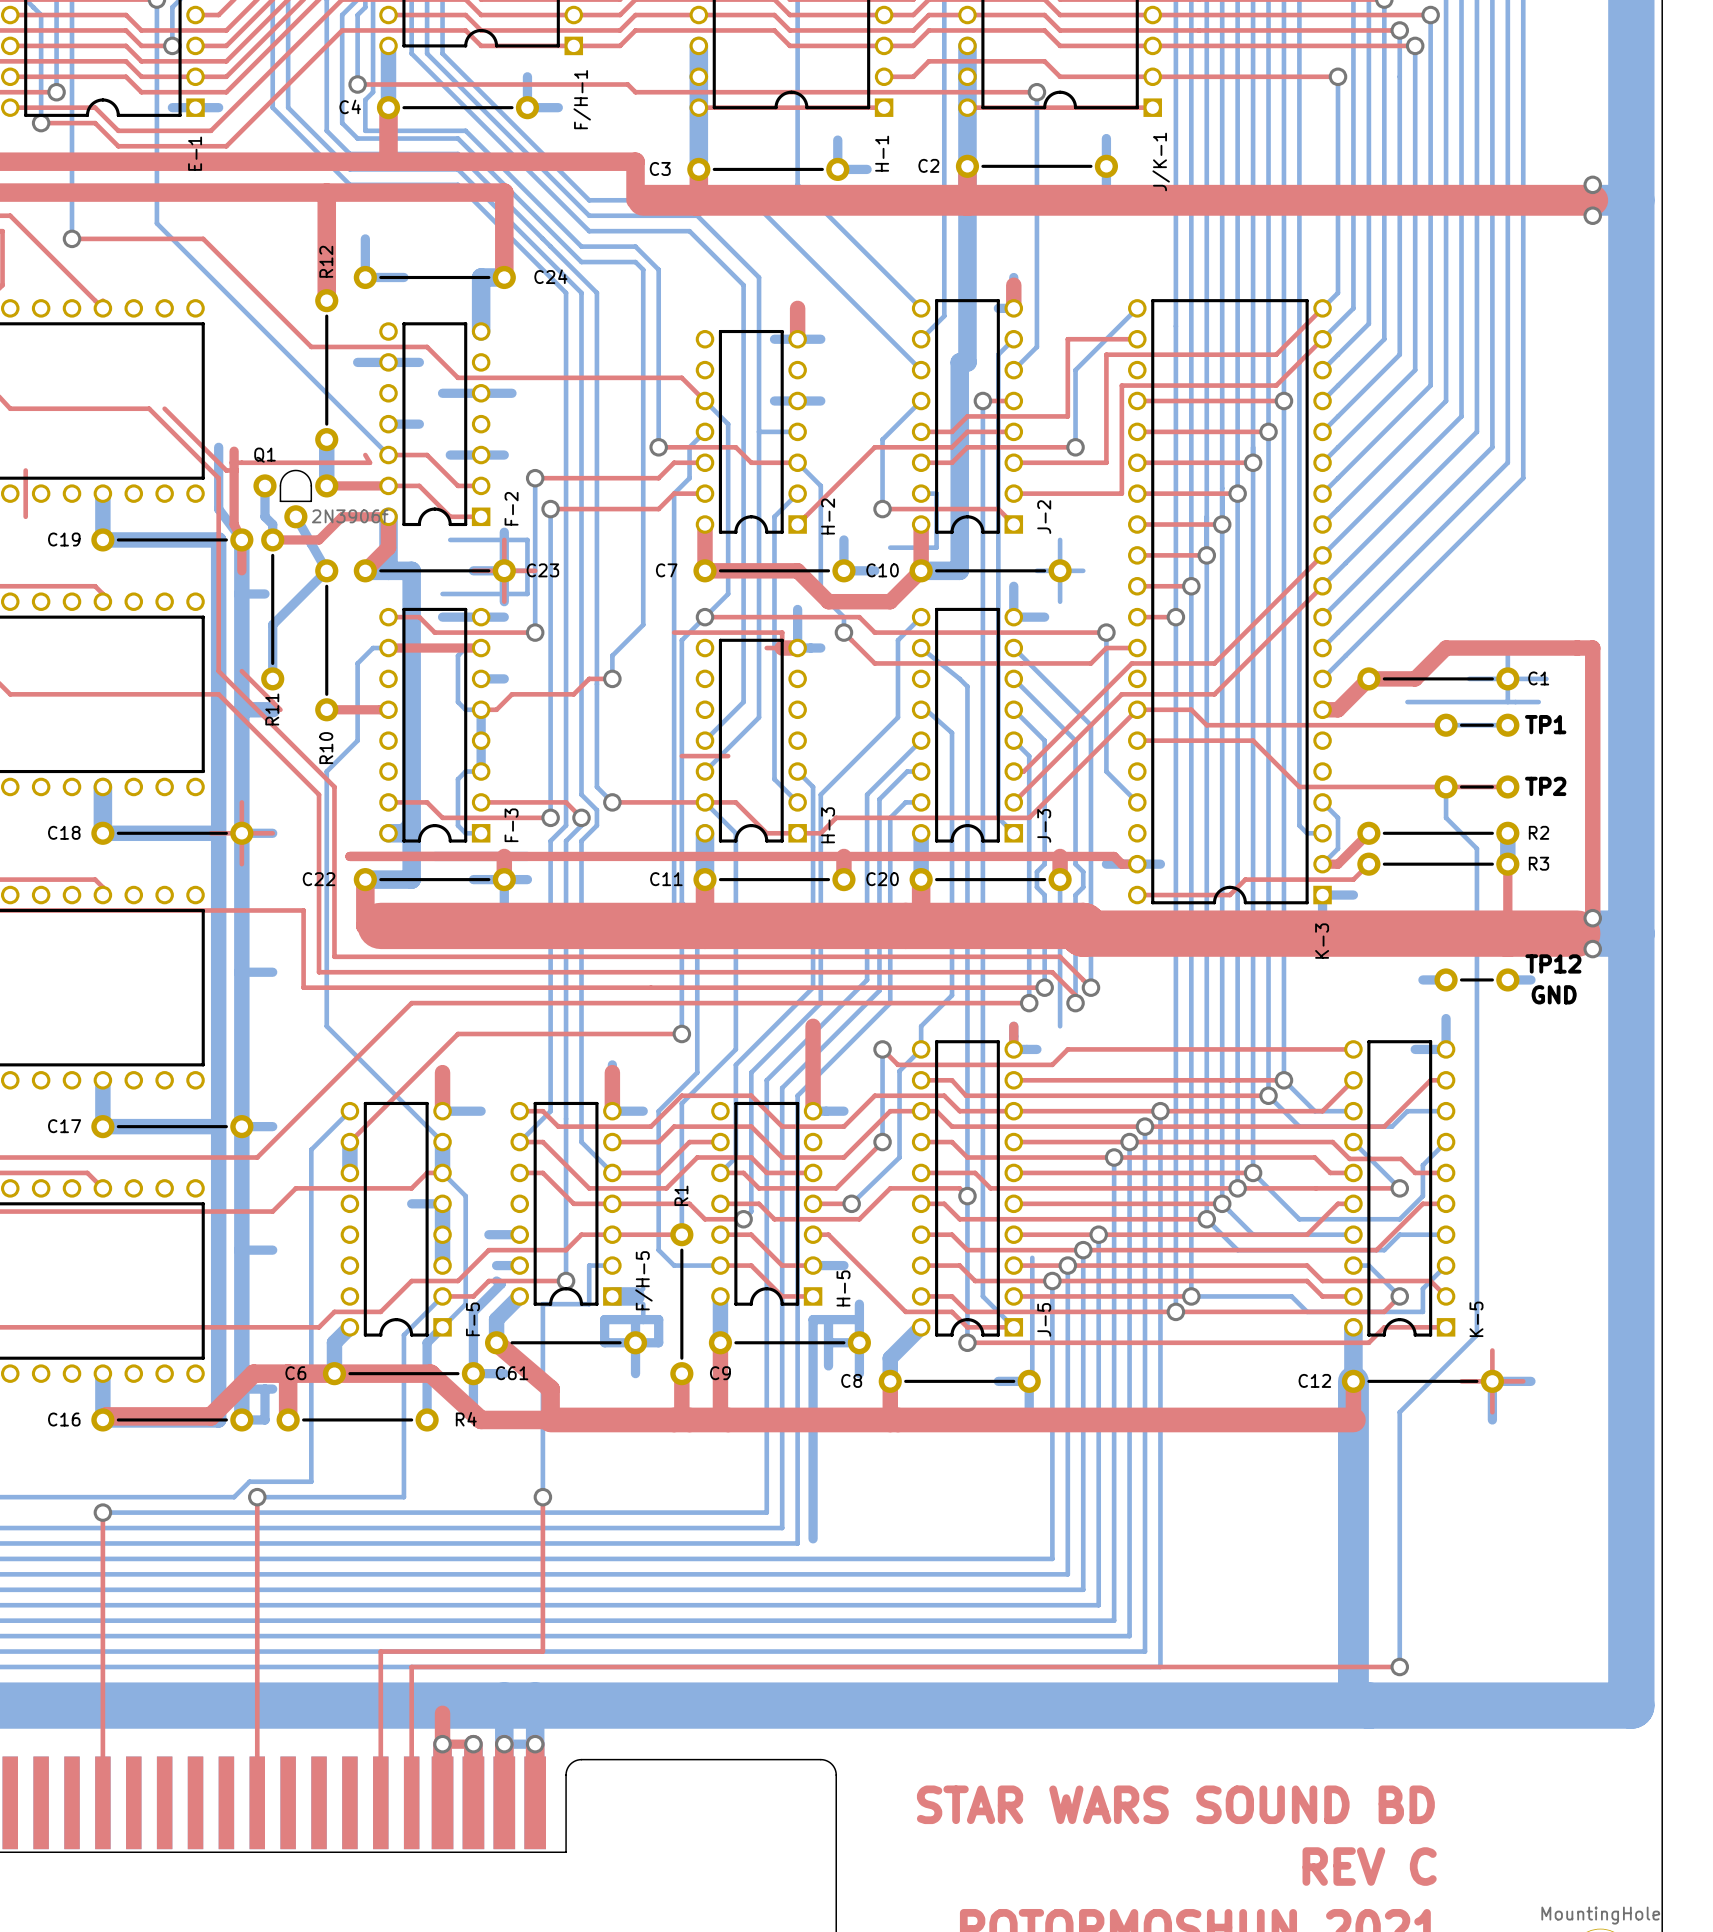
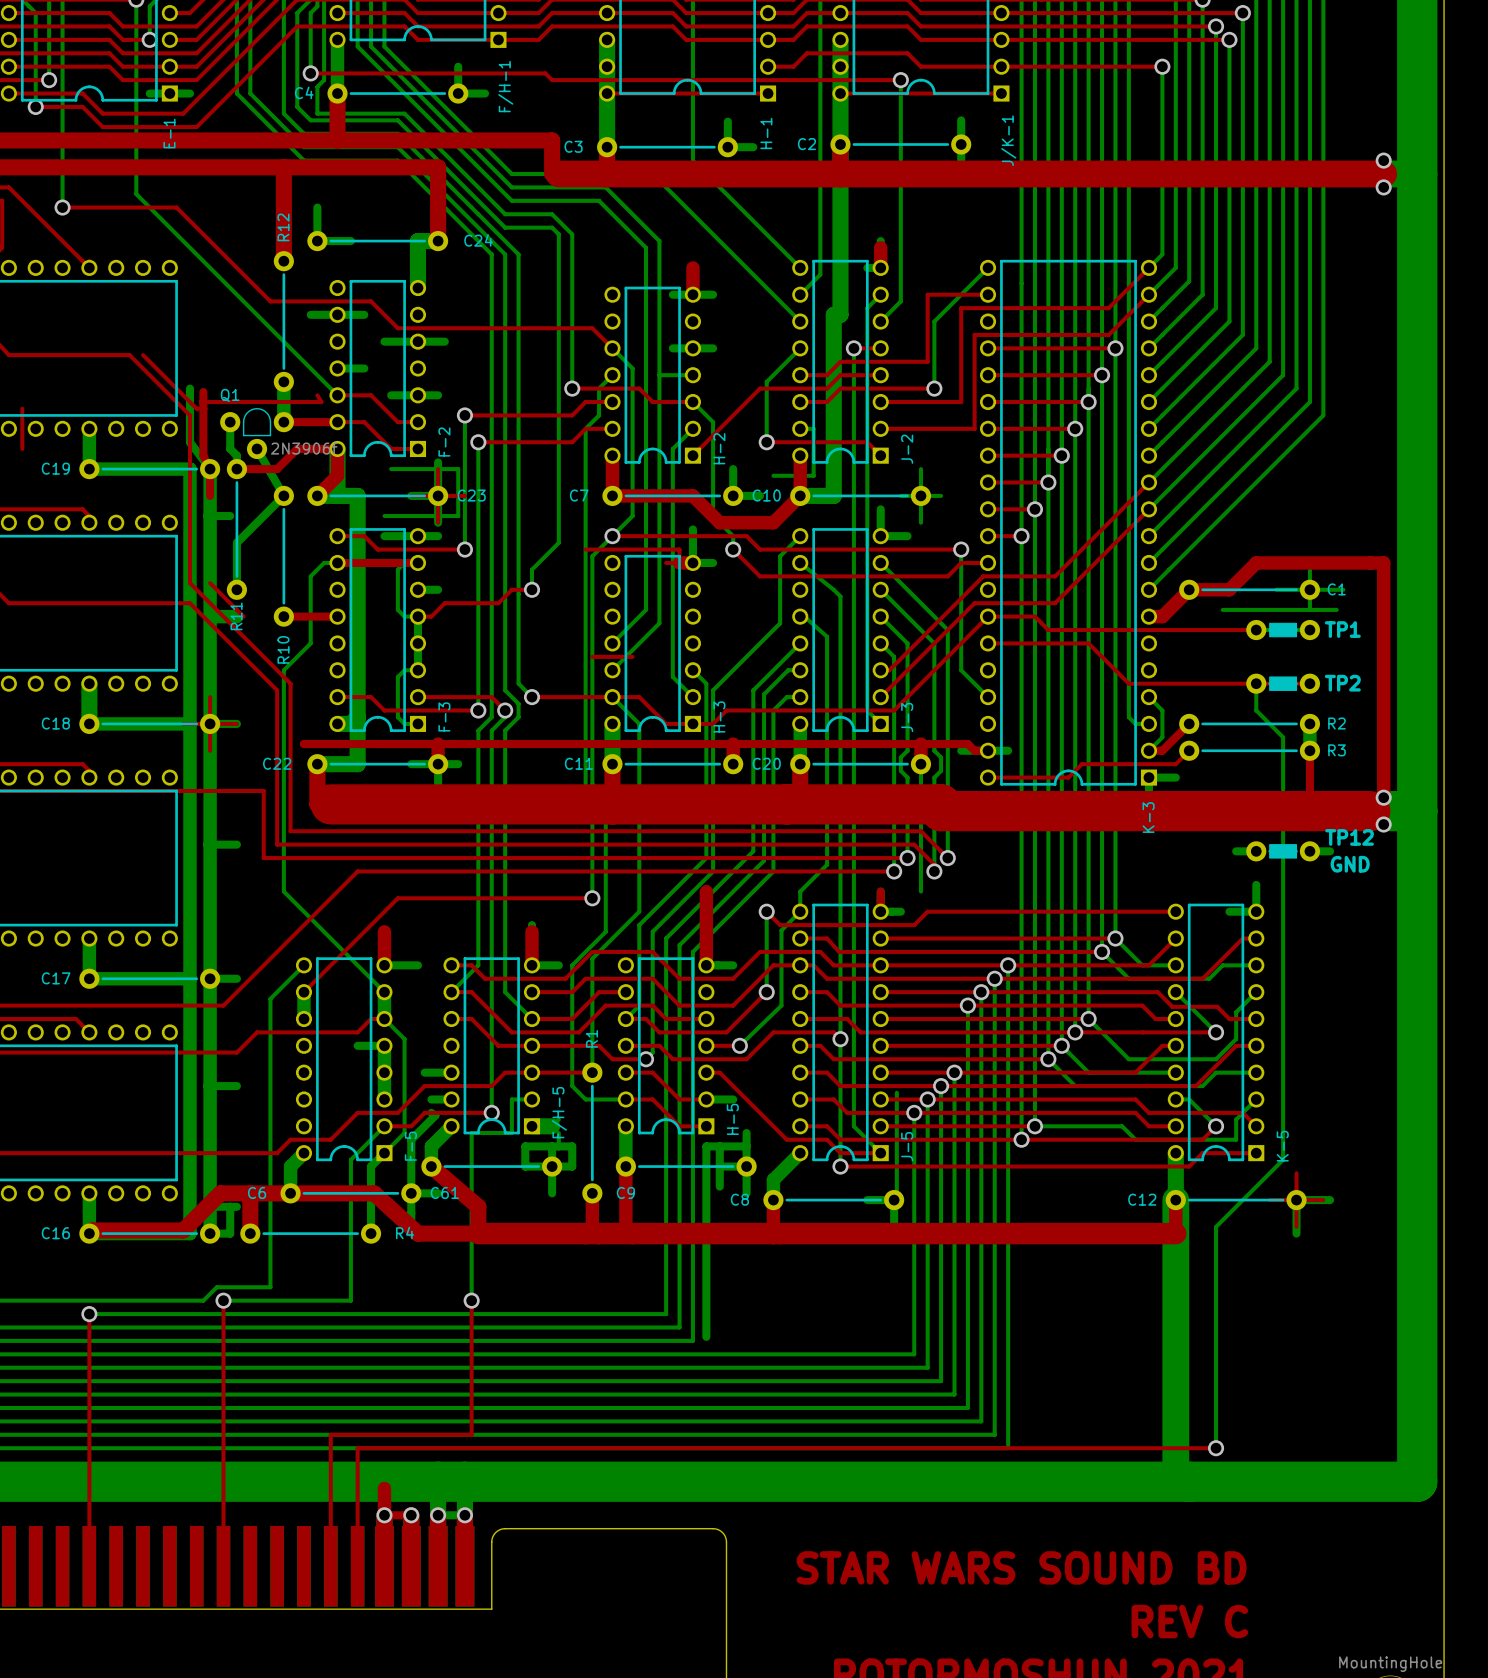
drawing: none -> [1269, 622, 1298, 638]
drawing: none -> [1269, 676, 1298, 691]
drawing: none -> [1269, 844, 1298, 859]

